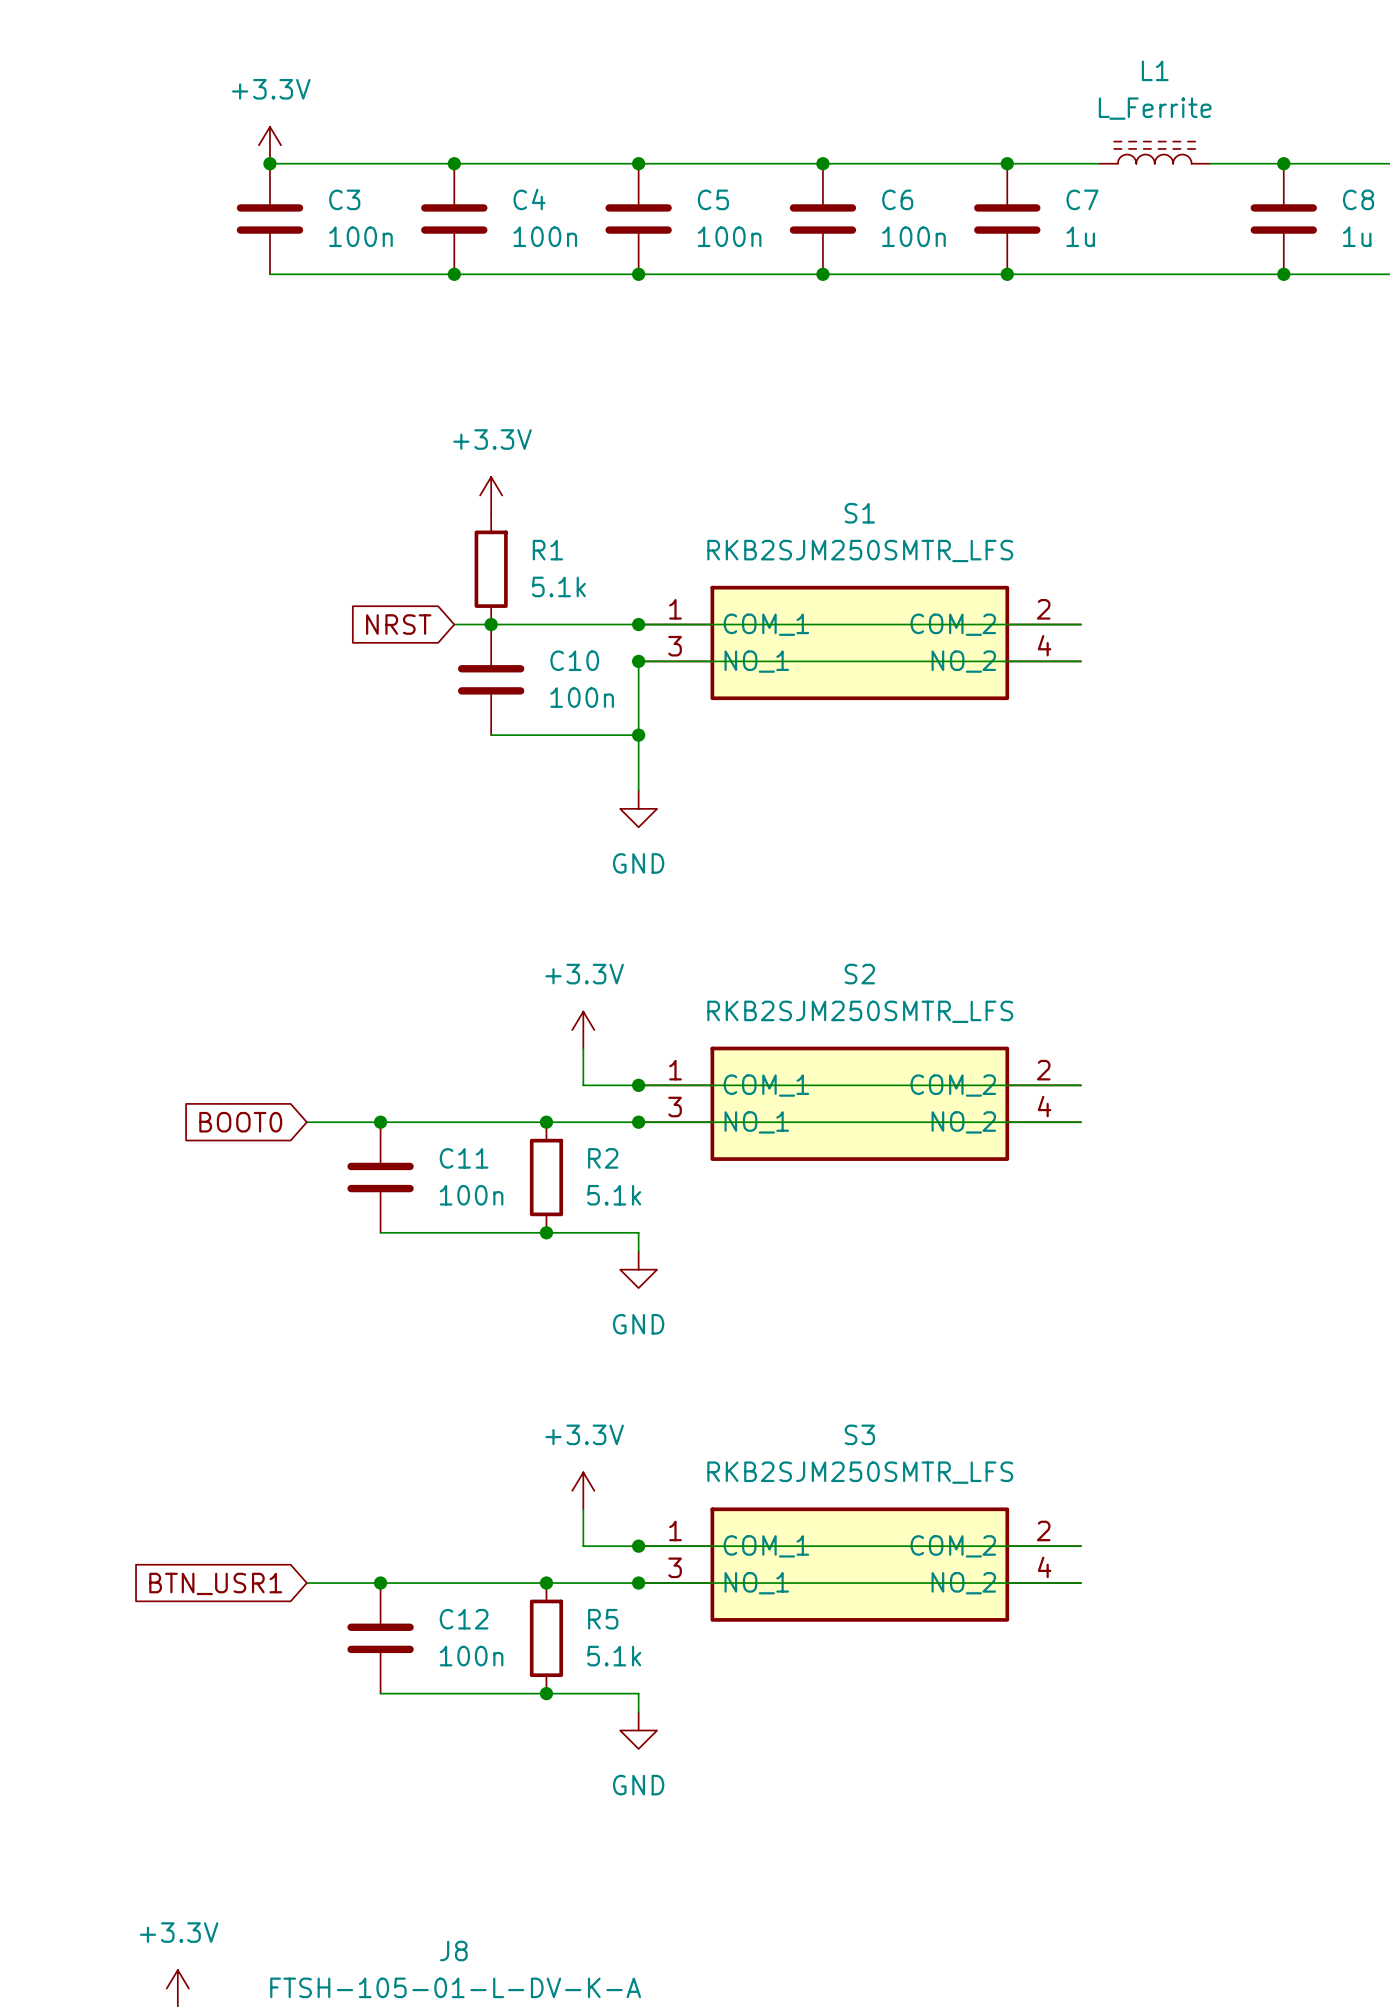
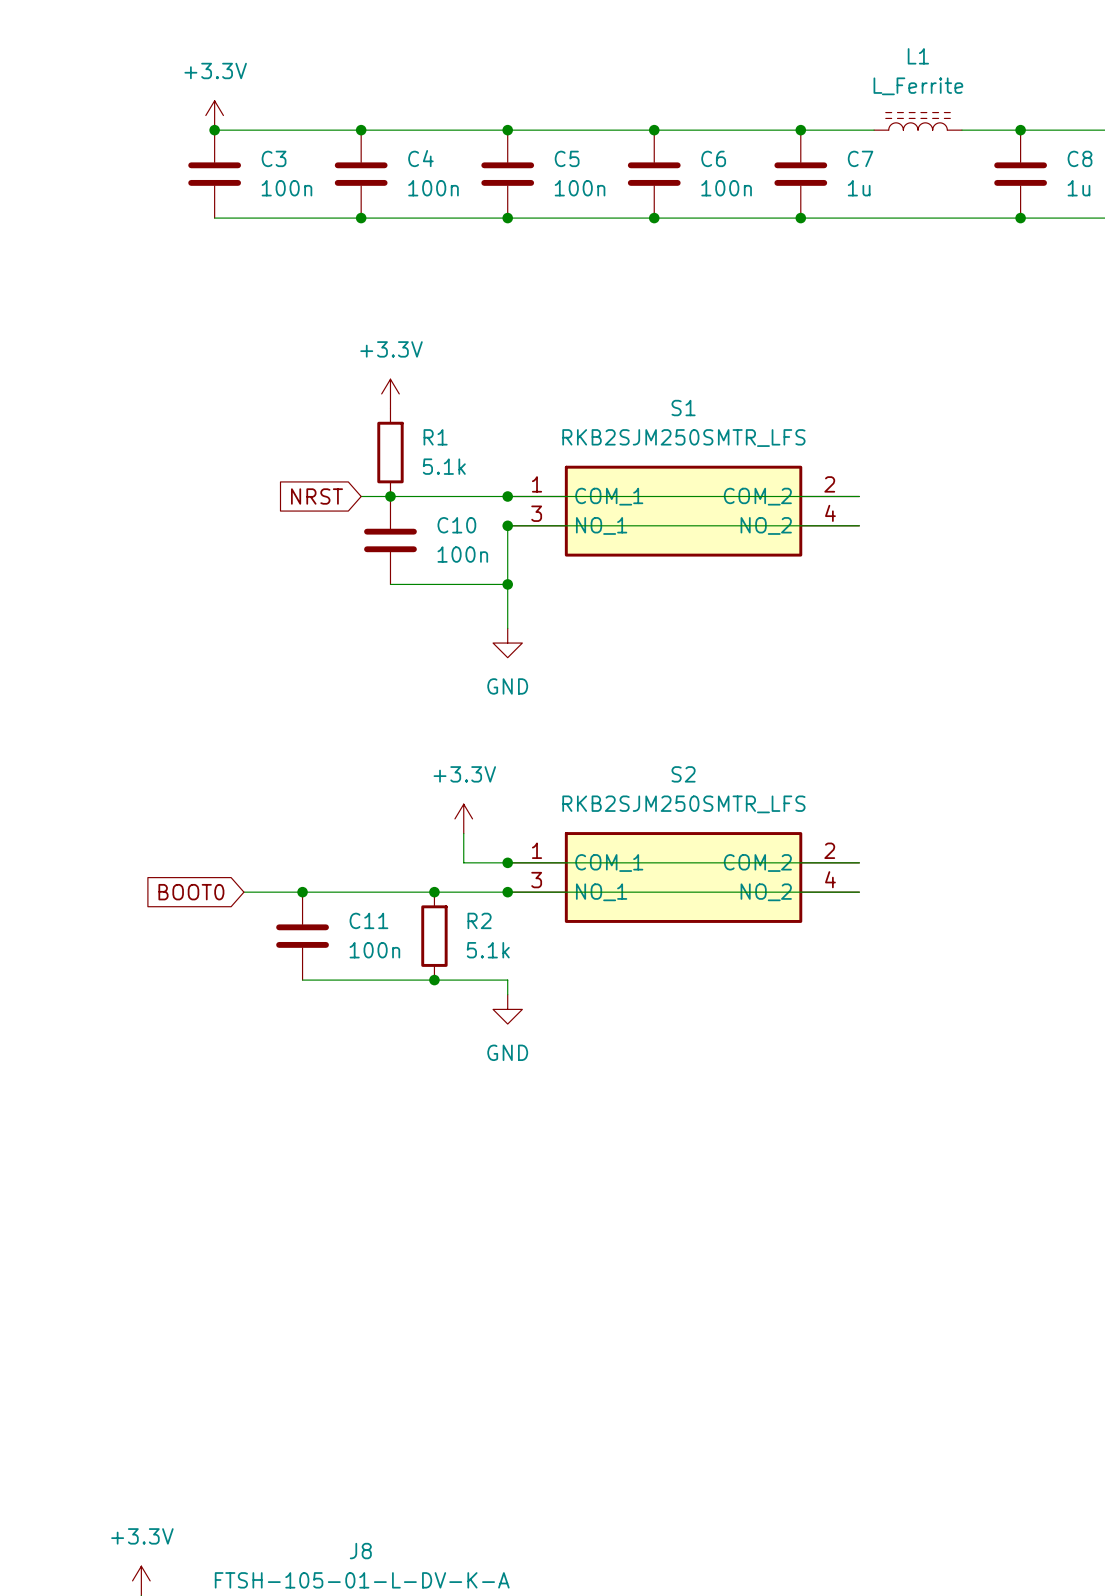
power symbol: +3.3V (583, 1490) -> none
wire: (583, 1509) (583, 1546) (1081, 1546) -> none
junction: (638, 1546) -> none
S3: RKB2SJM250SMTR_LFS (859, 1564) -> none
global label: BTN_USR1 (215, 1583) -> none
wire: (306, 1583) (1081, 1583) -> none
junction: (380, 1583) -> none
junction: (546, 1583) -> none
junction: (638, 1583) -> none
C12: 100n (380, 1638) -> none
R5: 5.1k (546, 1638) -> none
wire: (380, 1693) (638, 1693) (638, 1712) -> none
junction: (546, 1693) -> none
power symbol: GND (638, 1730) -> none

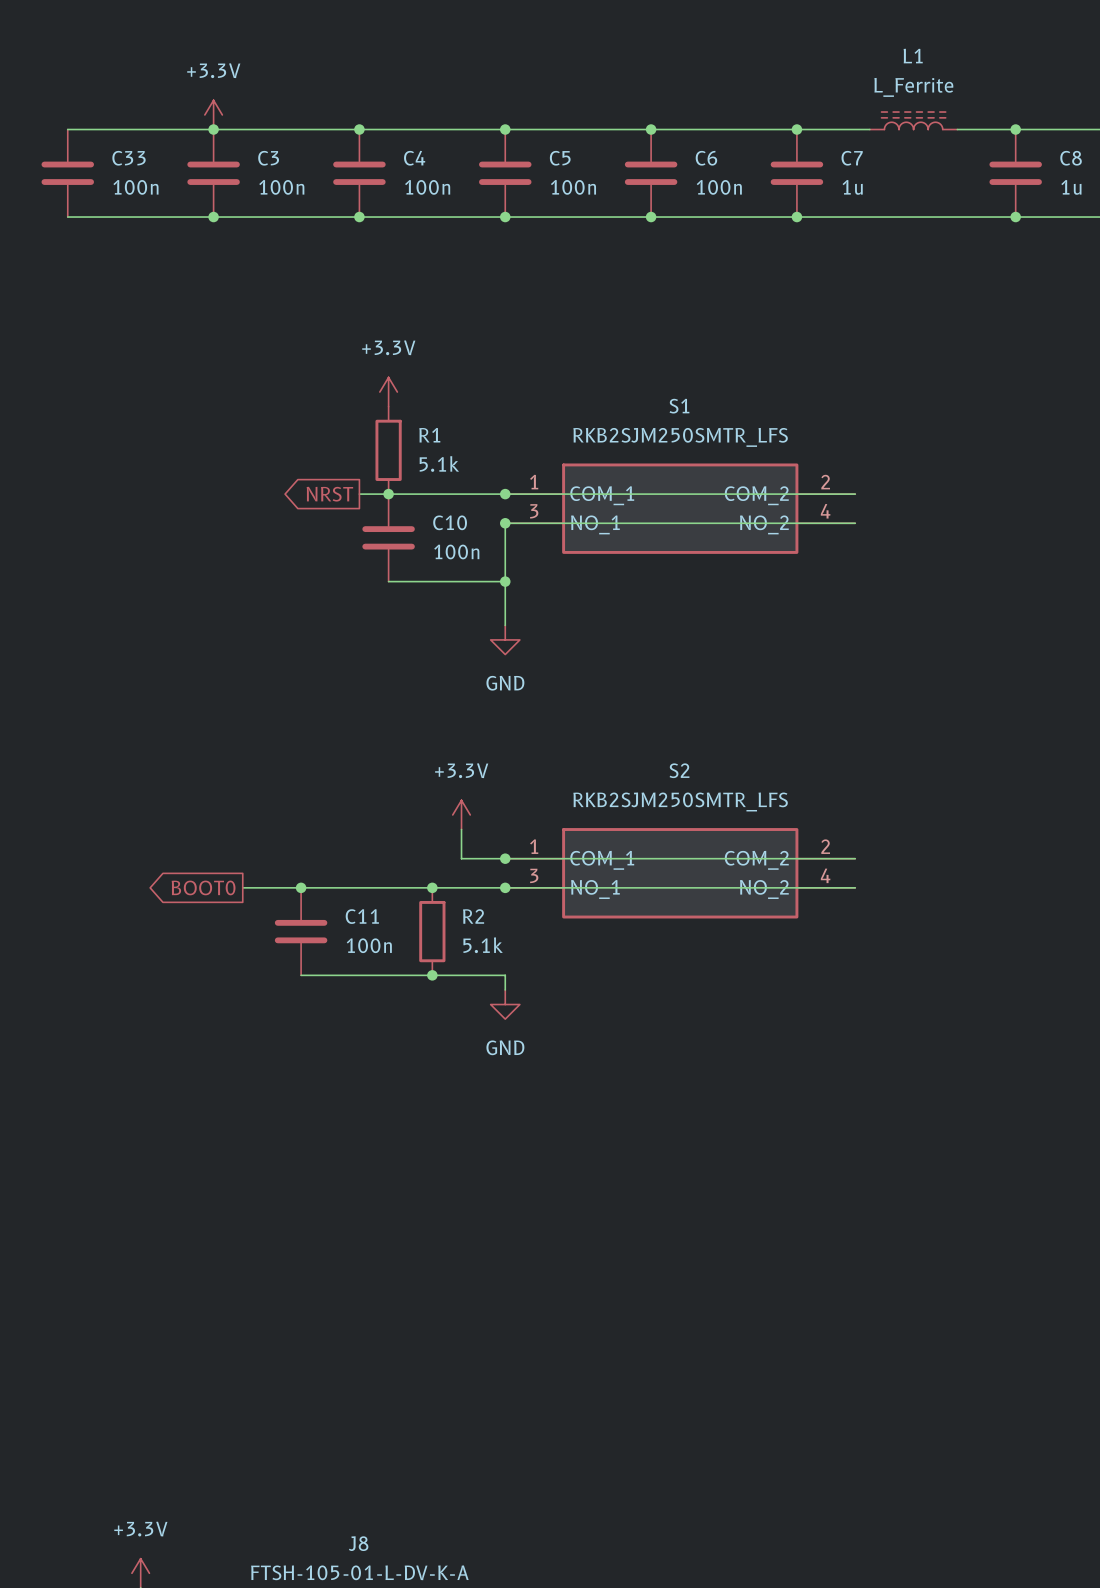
wire: none -> (67, 129) (213, 129)
C33: none -> 100n (67, 173)
wire: none -> (67, 217) (213, 217)
junction: none -> (213, 217)
global label shape: input (317, 496) -> output (329, 494)
global label shape: input (191, 892) -> output (203, 887)

